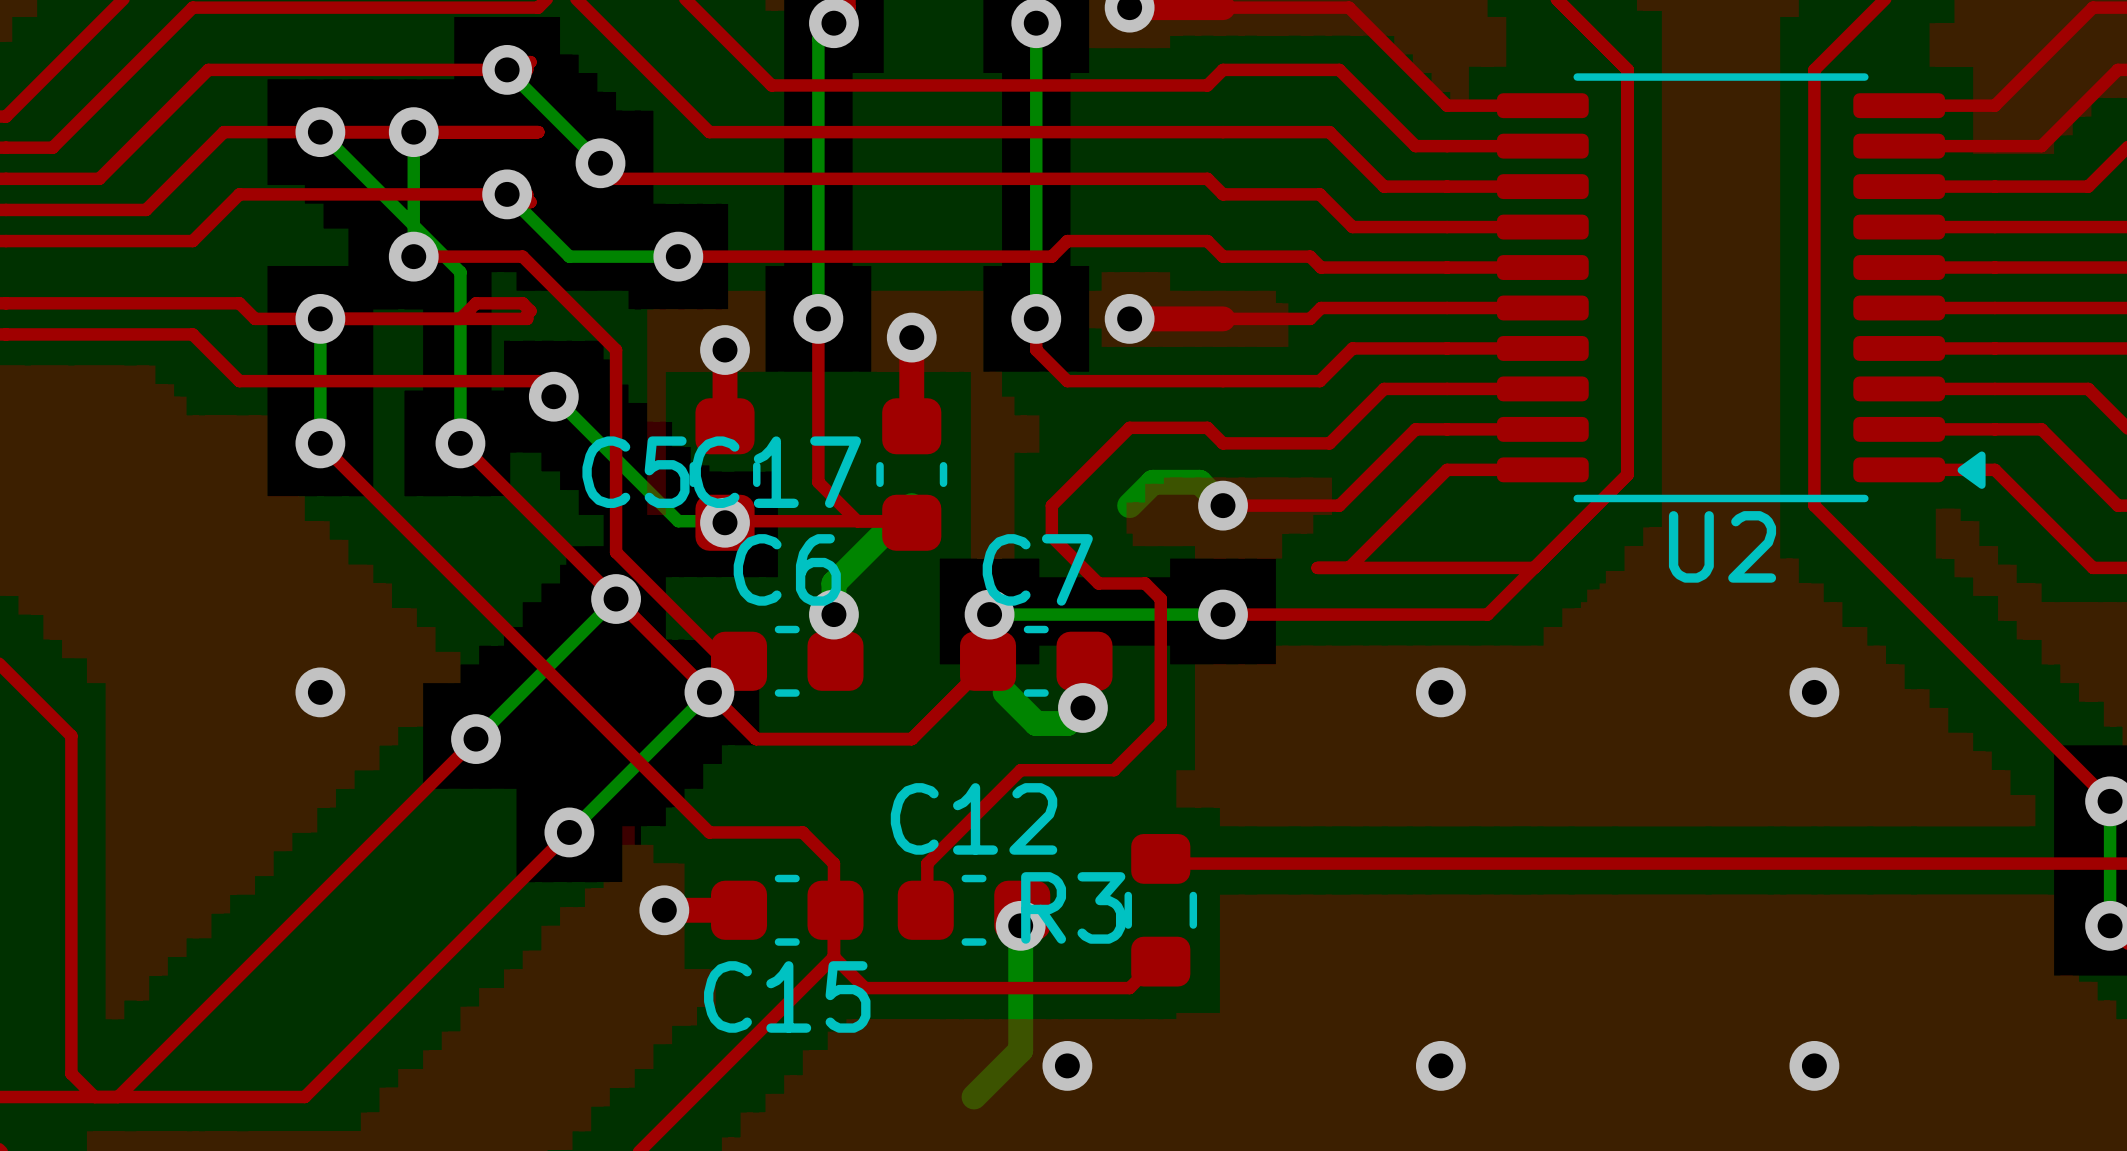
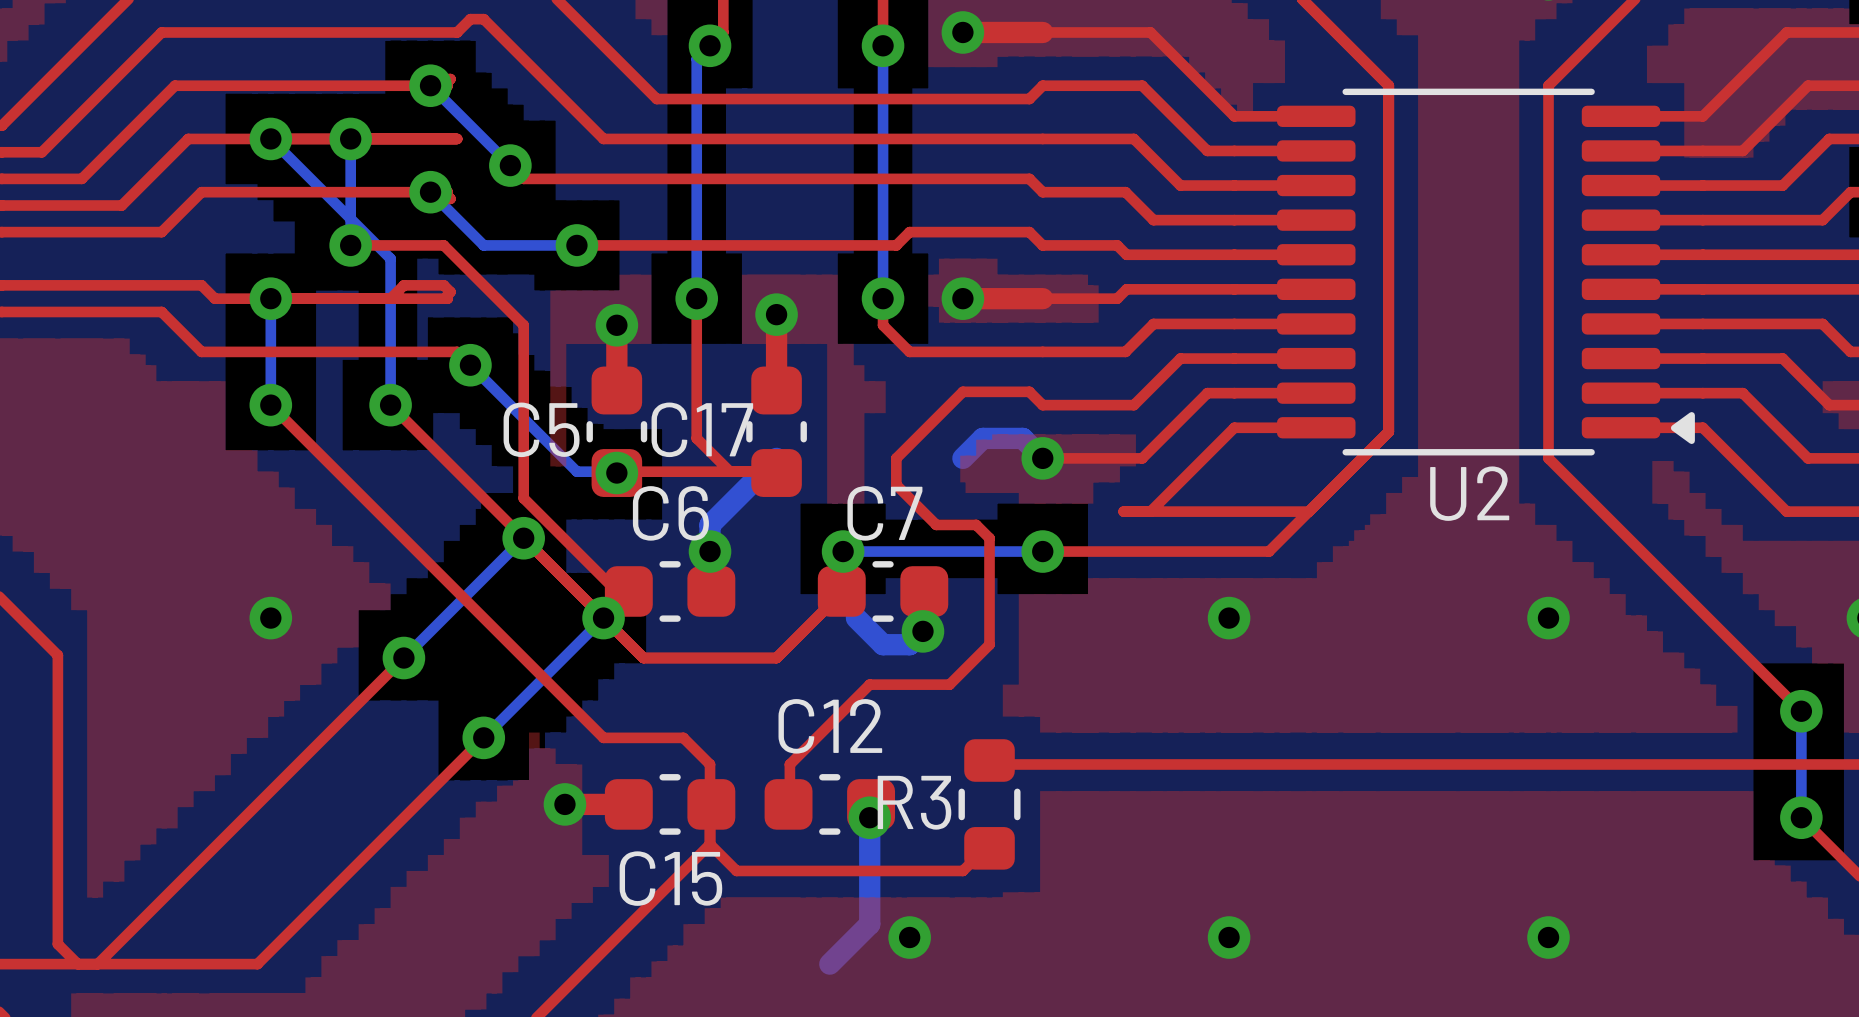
C17 name position: C17 (776, 472) -> C17 (702, 429)

